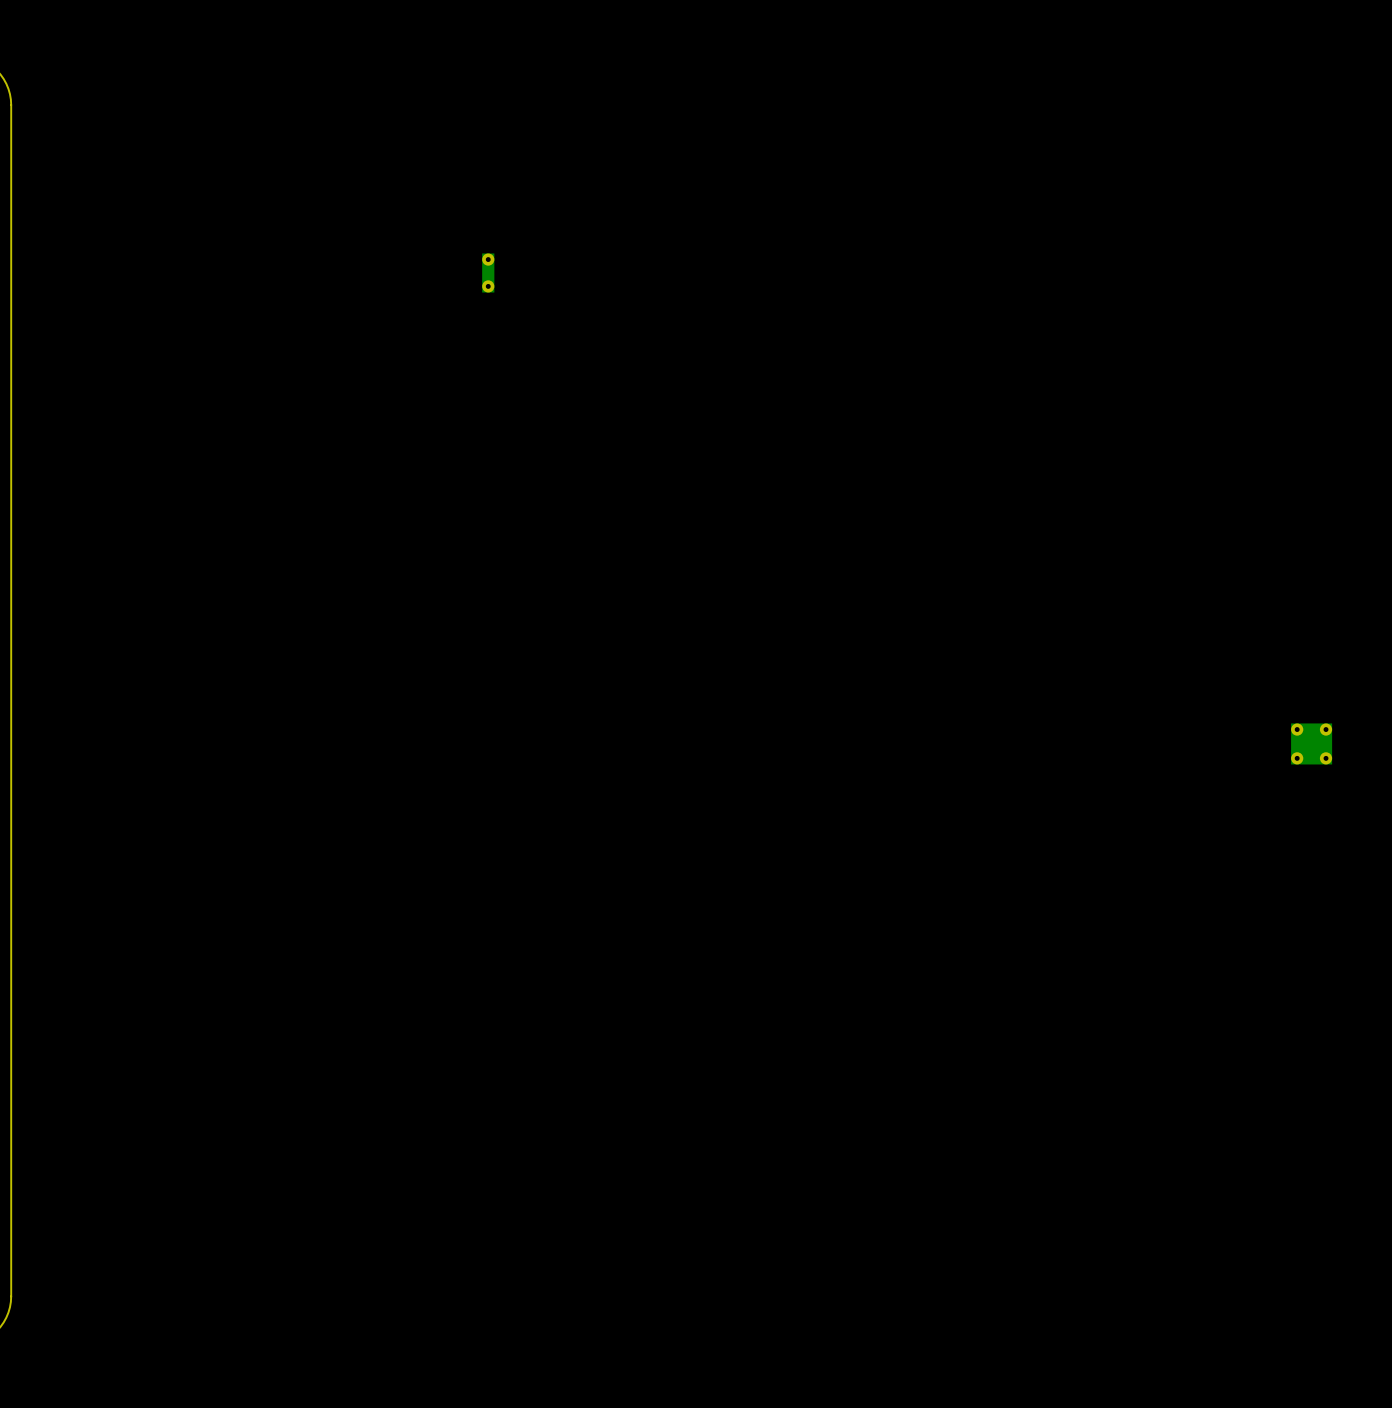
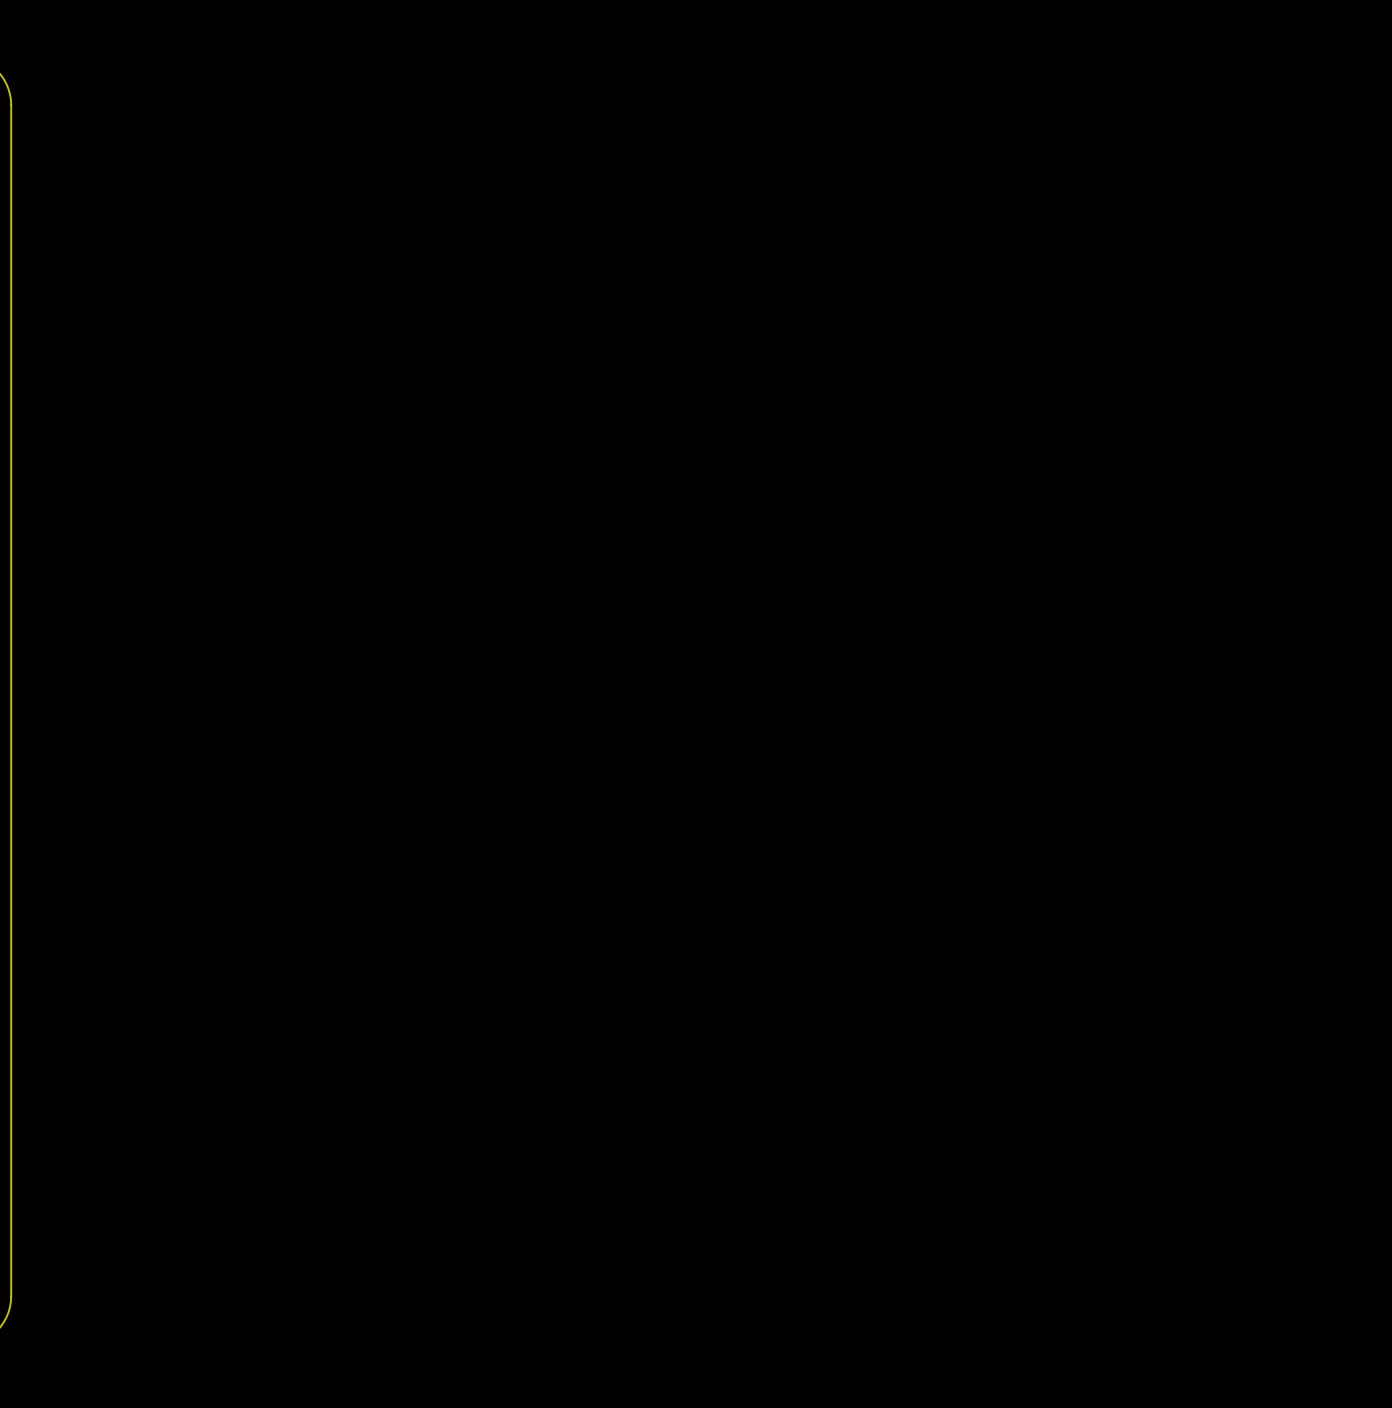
part: (488, 272) -> none
part: (1311, 743) -> none

